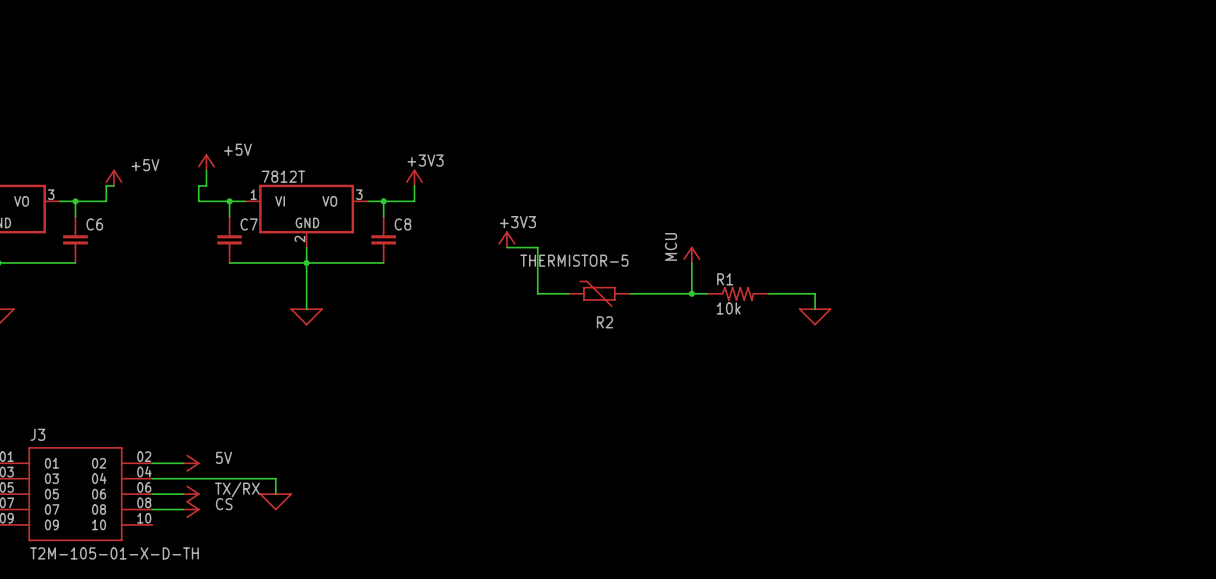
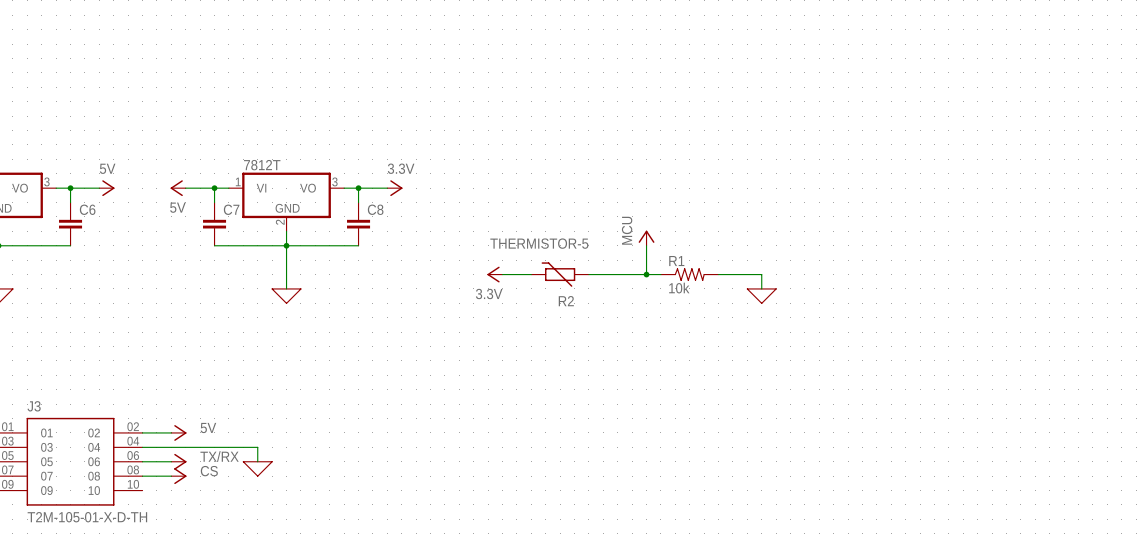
power symbol: +5V (206, 162) -> none
wire: (206, 170) (206, 185) (198, 185) (198, 201) -> none
power symbol: +5V (114, 177) -> none
power symbol: +3V3 (414, 177) -> none
wire: (114, 185) (106, 185) (106, 201) -> none
wire: (414, 185) (414, 201) -> none
power symbol: none -> 5V (106, 188)
power symbol: none -> 5V (178, 188)
power symbol: none -> 3.3V (394, 188)
power symbol: +3V3 (506, 239) -> none
wire: (506, 247) (537, 247) (537, 293) -> none
power symbol: none -> 3.3V (494, 274)

